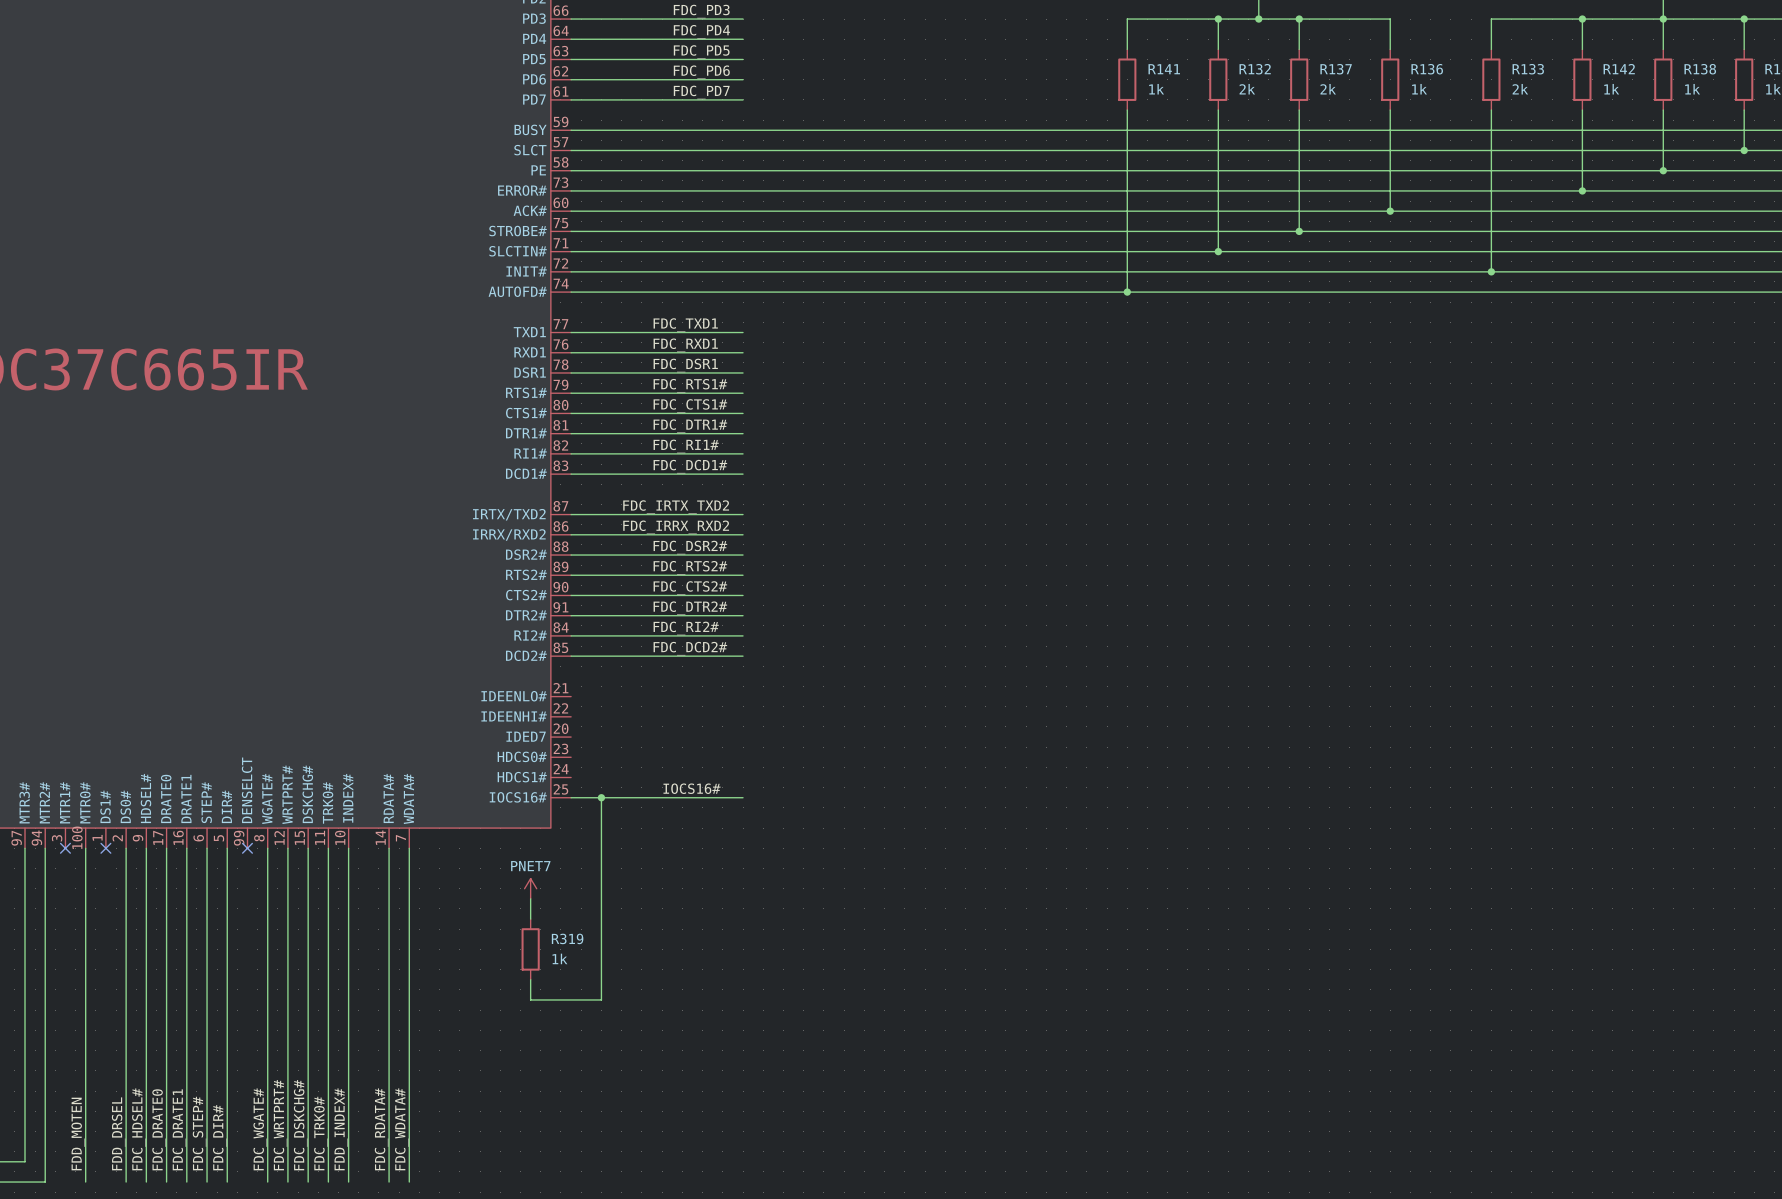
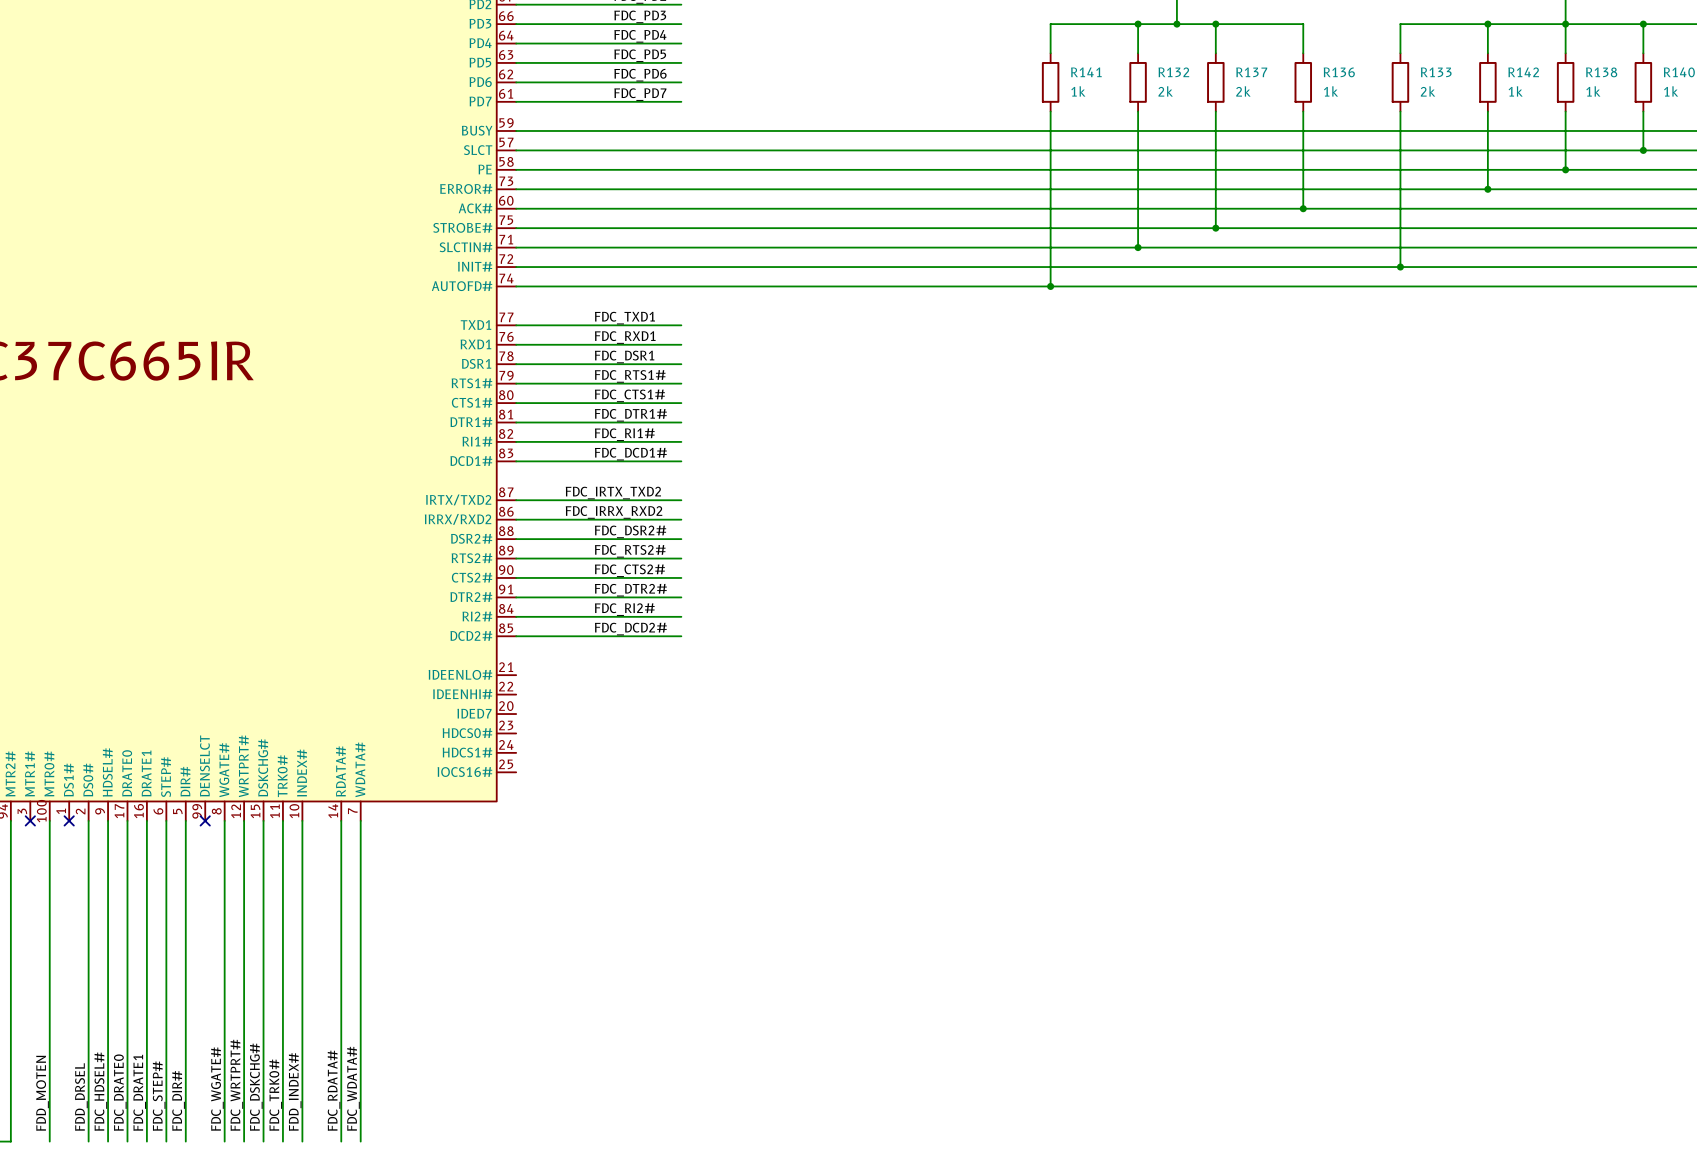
label: IOCS16# (692, 788) -> none
wire: (571, 797) (743, 797) -> none
wire: (601, 797) (601, 999) (530, 999) (530, 979) -> none
junction: (601, 797) -> none
power symbol: PNET7 (530, 888) -> none
wire: (530, 898) (530, 919) -> none
R319: 1k (530, 949) -> none

